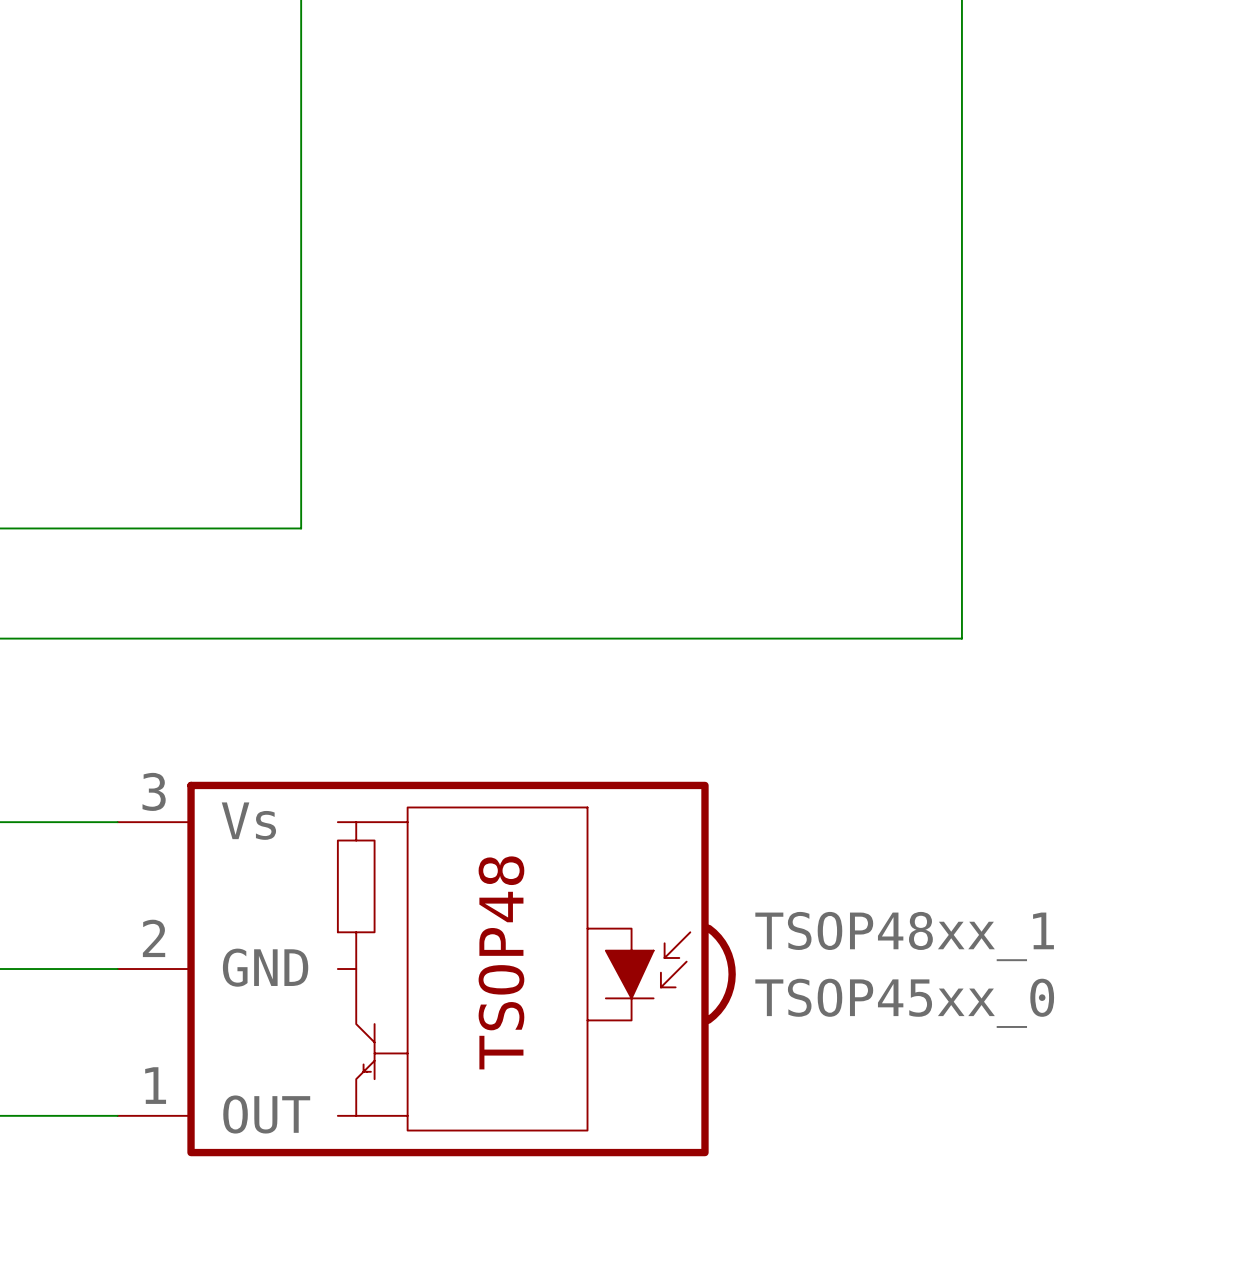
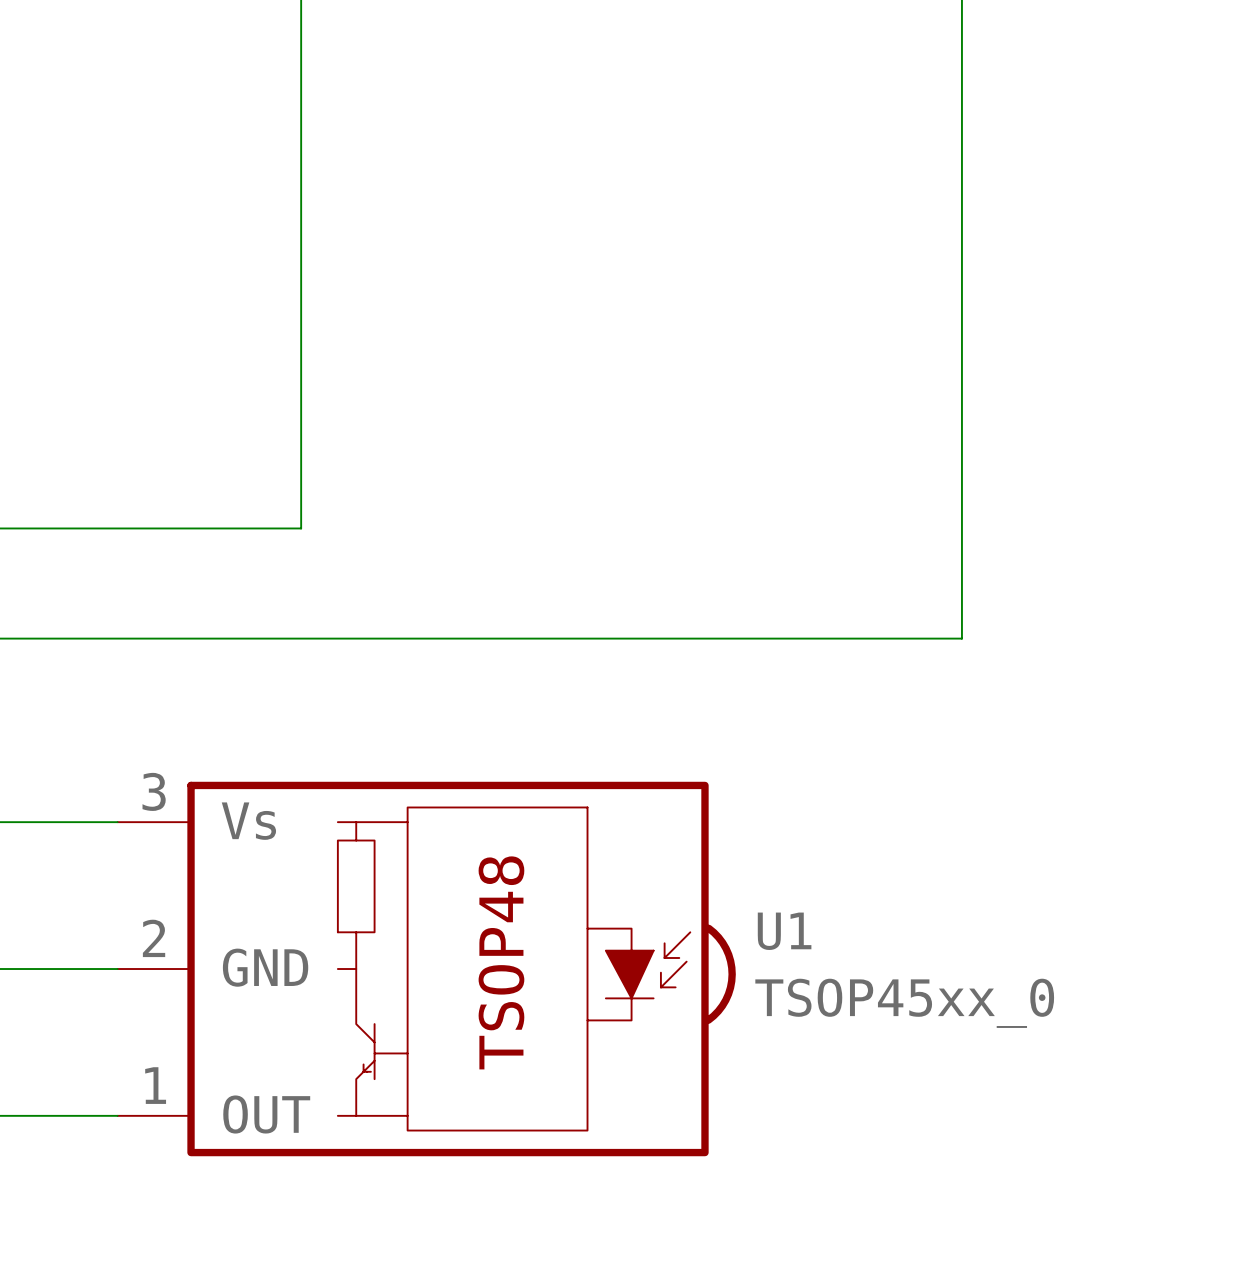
TSOP48xx_1 name: TSOP48xx_1 (904, 936) -> U1 (784, 931)

